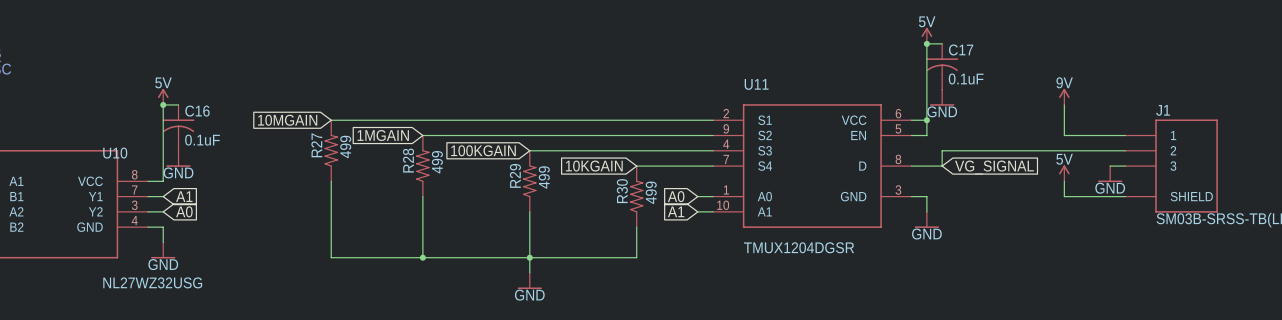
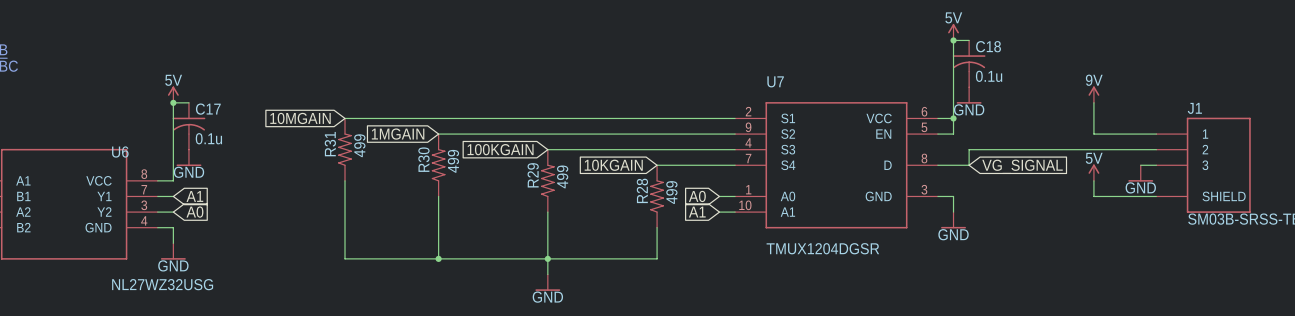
C17 name: C17 (961, 49) -> C18 (988, 46)
C17 value: 0.1uF (966, 79) -> 0.1u (989, 76)
U11 name: U11 (756, 84) -> U7 (775, 81)
C16 name: C16 (197, 111) -> C17 (208, 109)
C16 value: 0.1uF (202, 140) -> 0.1u (208, 138)
R27 name: R27 (316, 145) -> R31 (330, 144)
U10 name: U10 (115, 153) -> U6 (120, 152)
R28 name: R28 (408, 160) -> R30 (423, 159)
R30 name: R30 (622, 191) -> R28 (642, 190)

